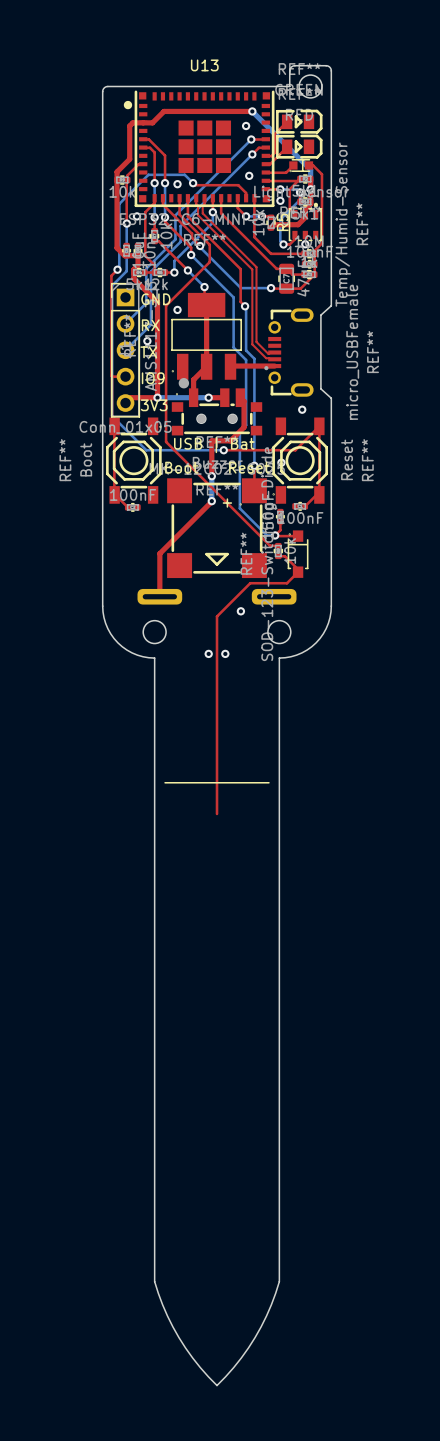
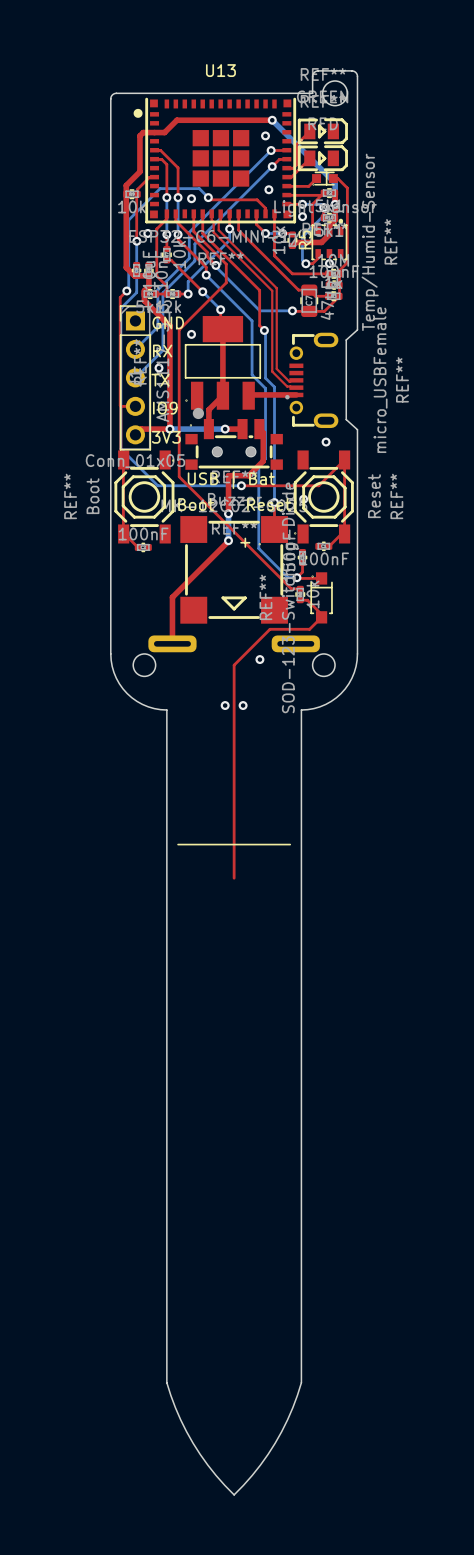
round board edge: none -> [132, 653, 157, 677]
round board edge: none -> [312, 653, 336, 677]
round board edge: [142, 620, 167, 645] -> none
round board edge: [267, 620, 292, 645] -> none

